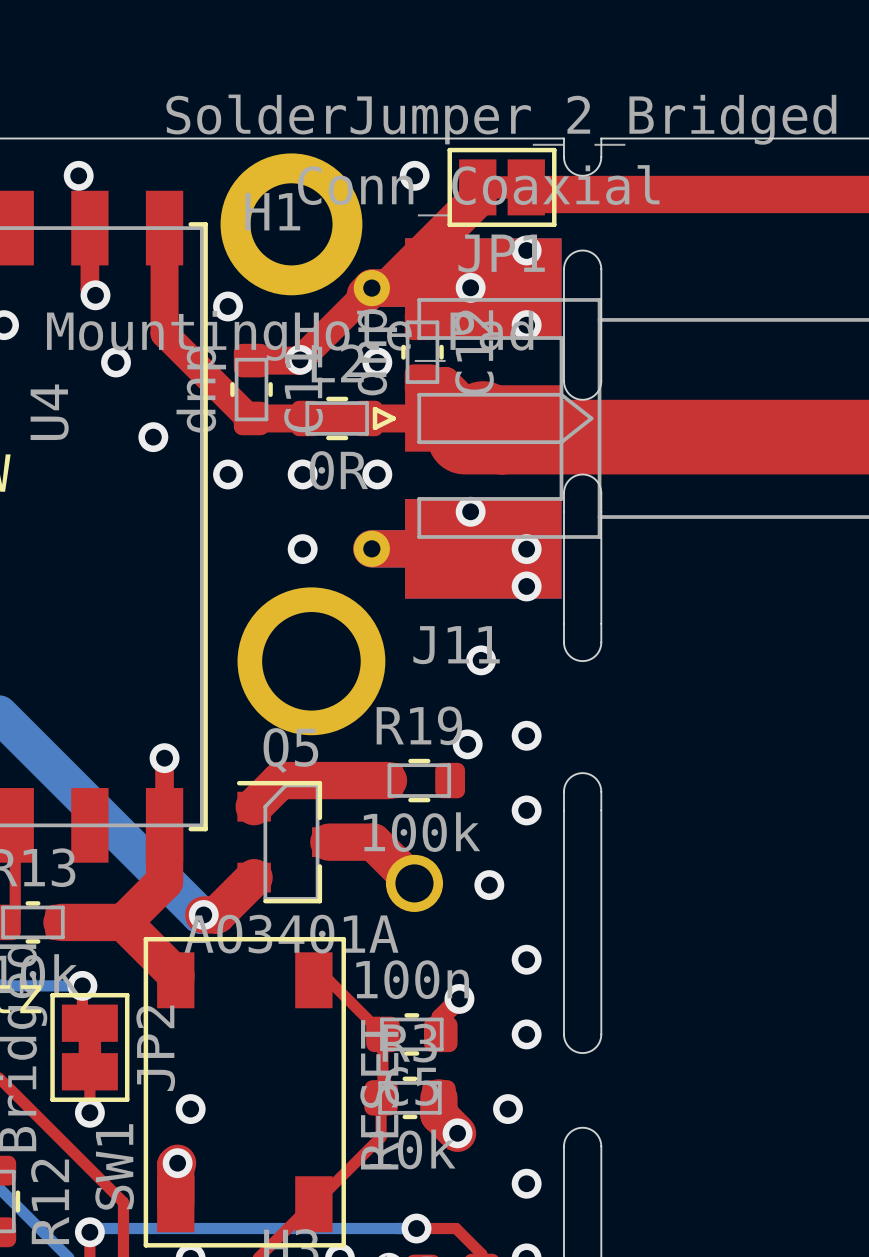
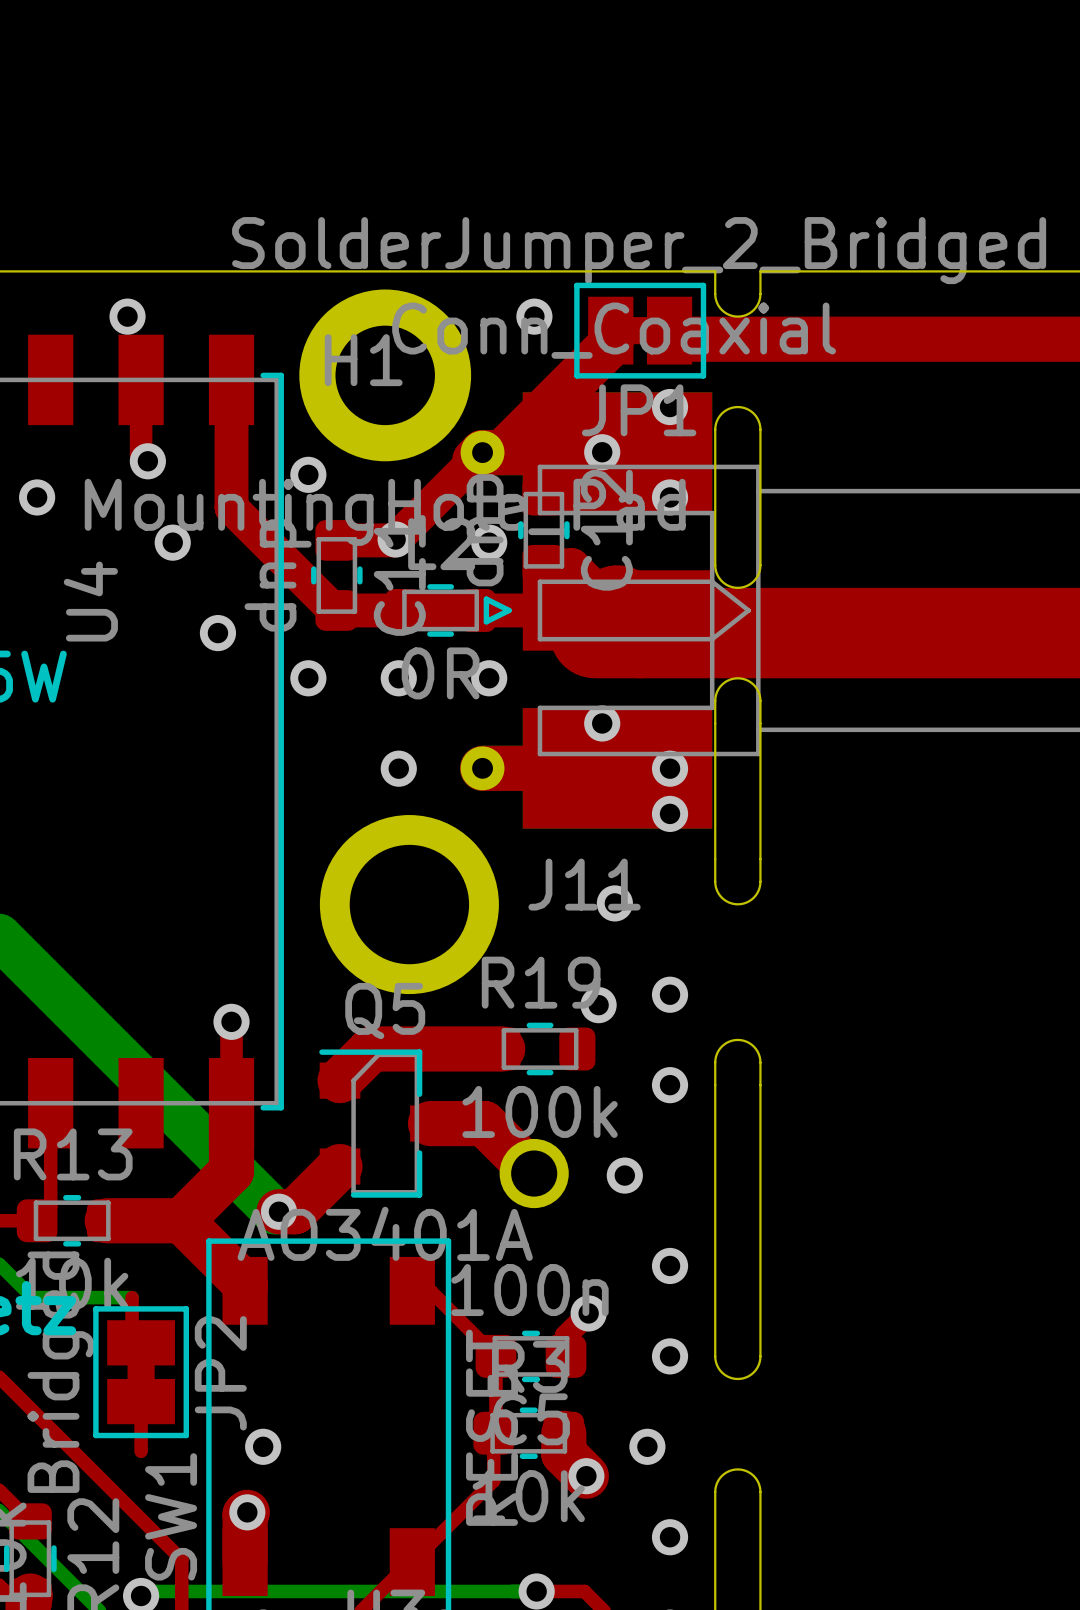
via: (82, 985) -> none
via: (89, 1112) -> none

